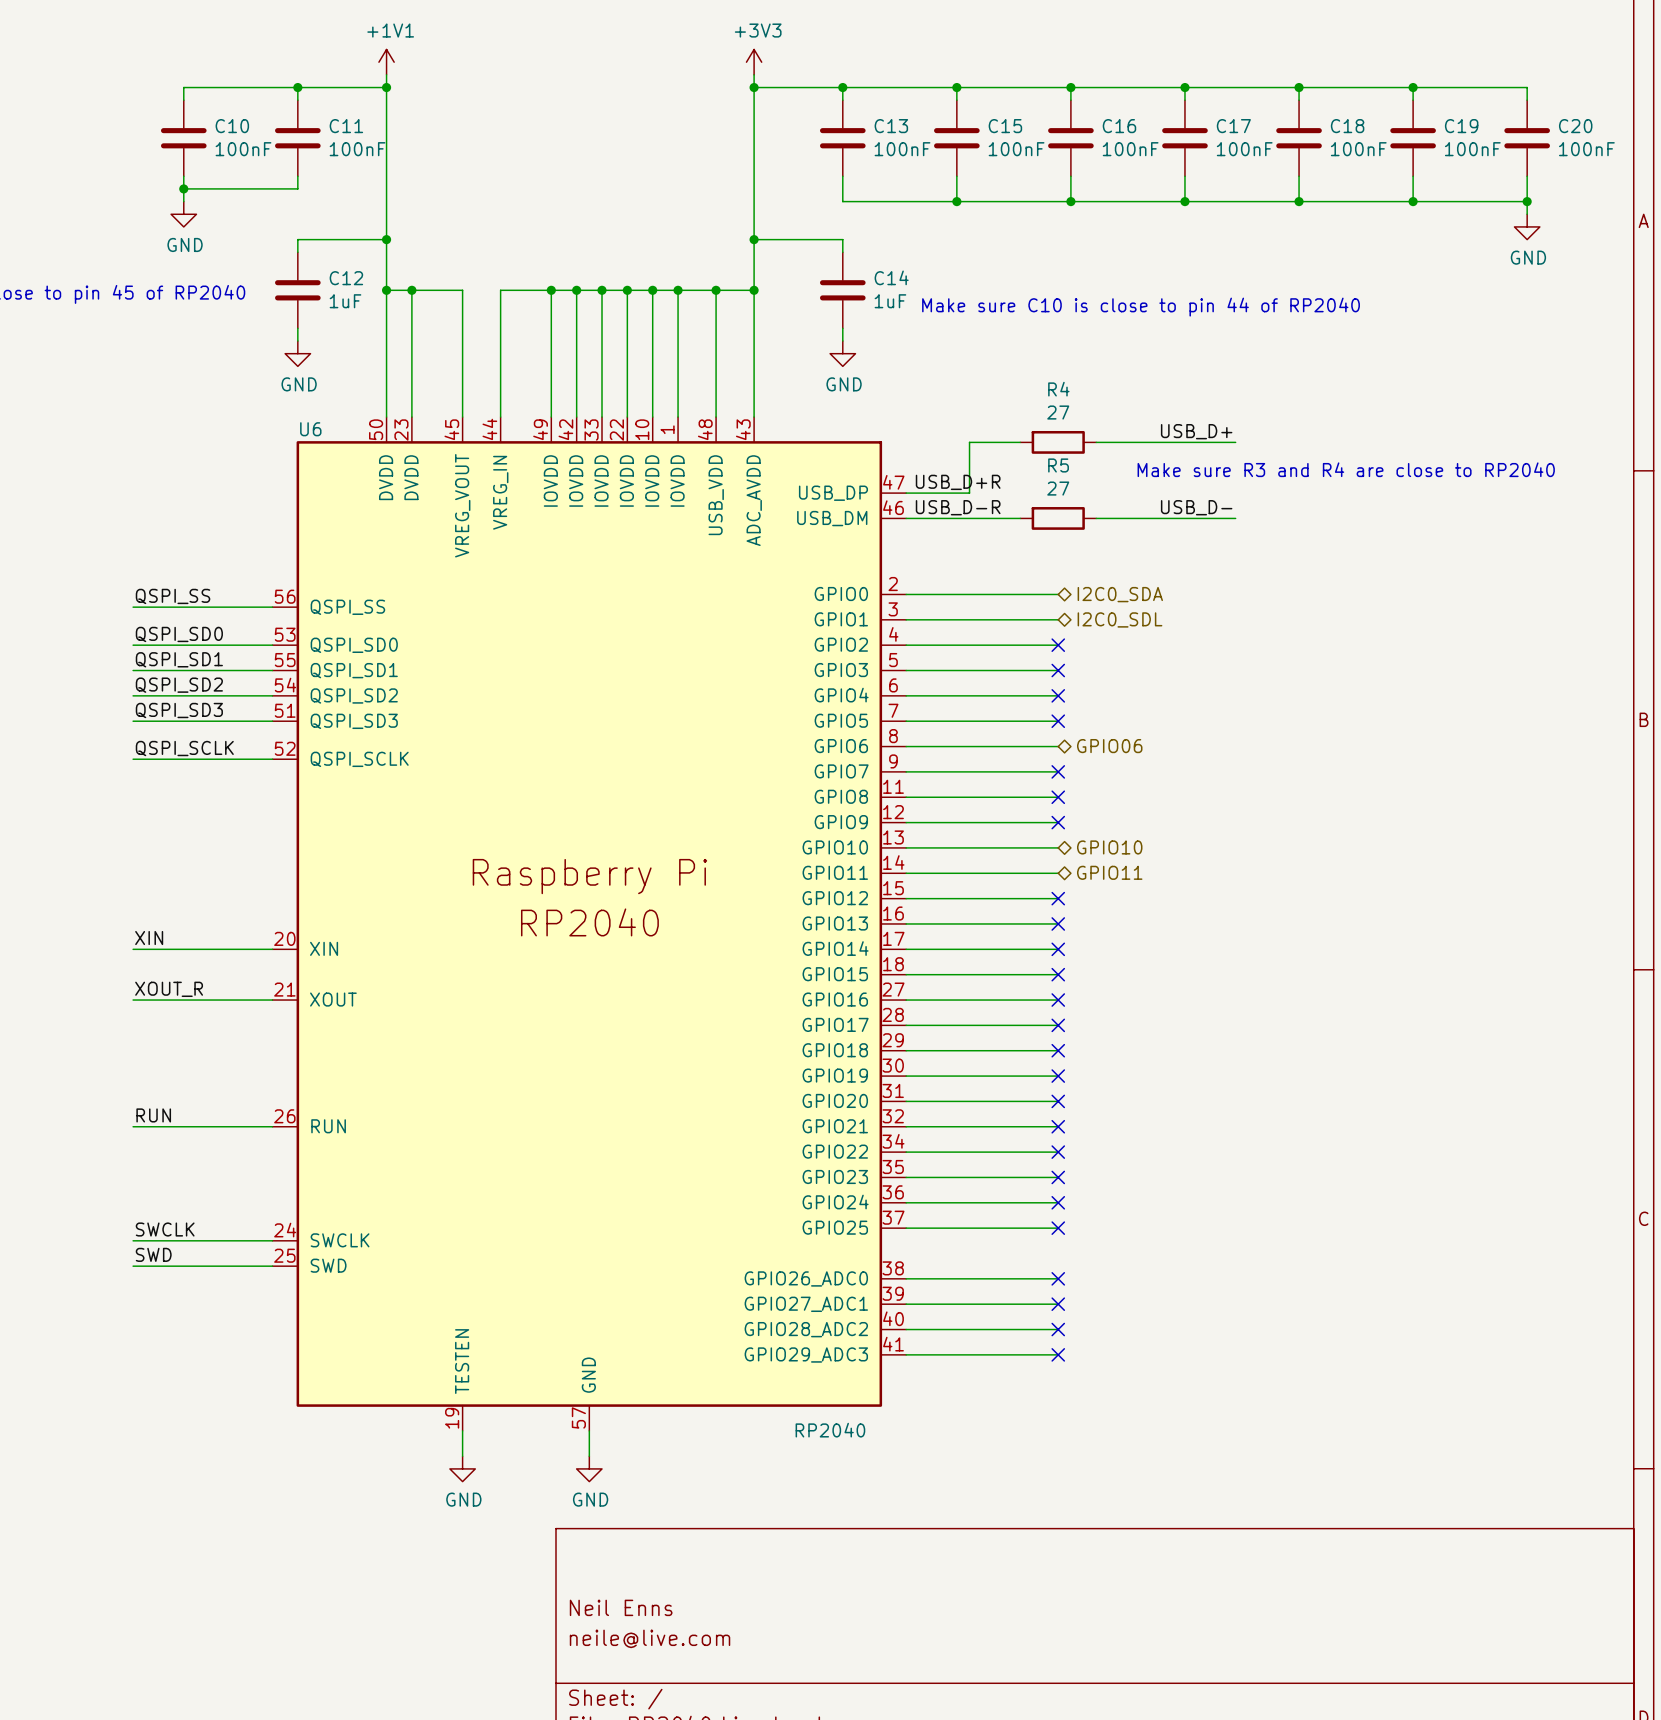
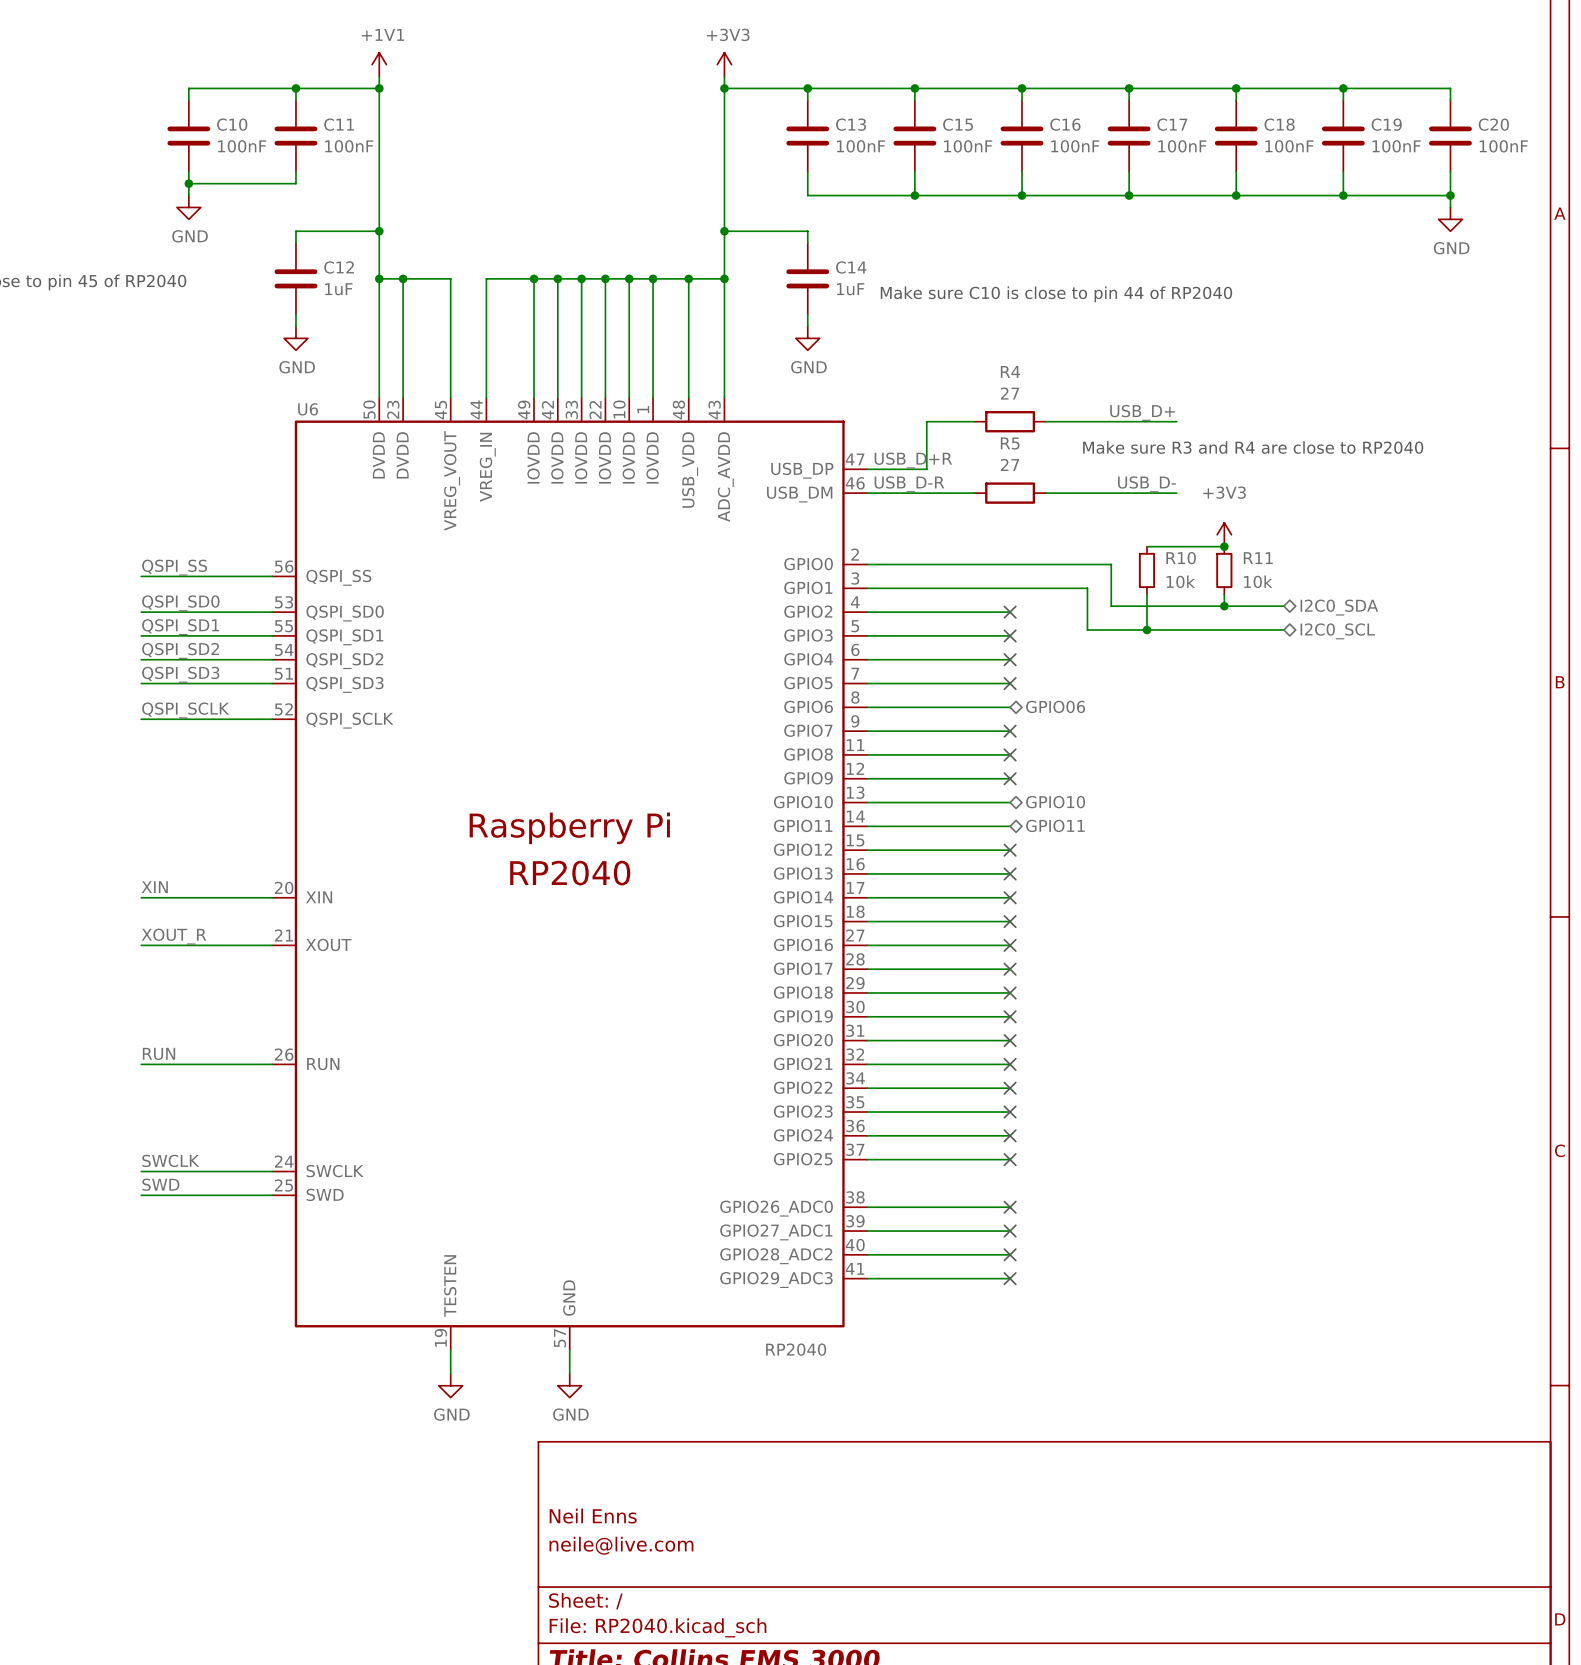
power symbol: none -> +3V3 (1224, 534)
wire: none -> (1146, 546) (1224, 546)
junction: none -> (1224, 546)
wire: none -> (1010, 564) (1111, 564) (1111, 606) (1283, 606)
hierarchical label: I2C0_SDA (1120, 594) -> none
R10: none -> 10k (1146, 570)
R11: none -> 10k (1224, 570)
wire: none -> (1010, 588) (1087, 588) (1087, 629) (1283, 629)
hierarchical label: I2C0_SDL (1120, 619) -> none
wire: none -> (1146, 594) (1146, 629)
wire: none -> (1224, 594) (1224, 606)
junction: none -> (1224, 606)
hierarchical label: none -> I2C0_SDA (1339, 607)
junction: none -> (1146, 629)
hierarchical label: none -> I2C0_SCL (1337, 631)

